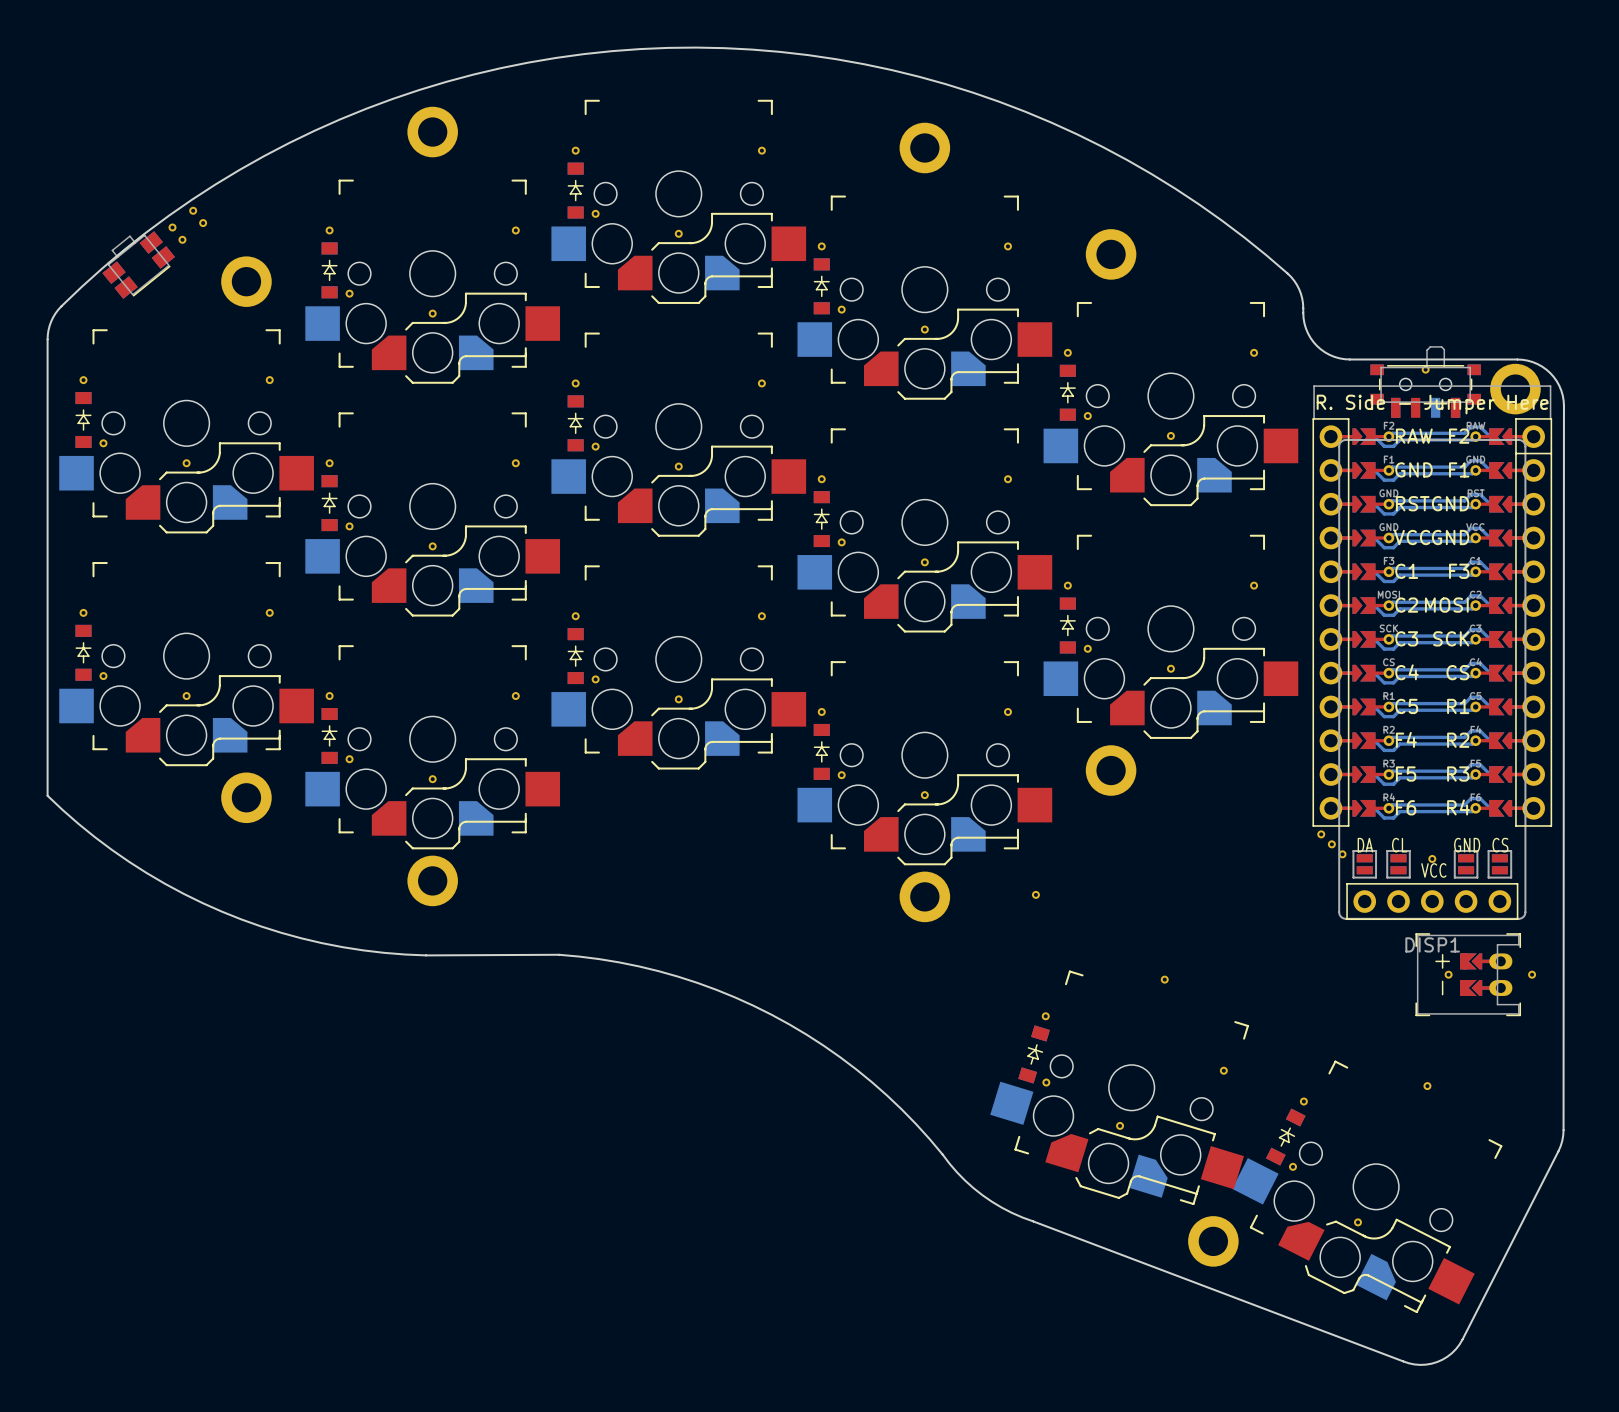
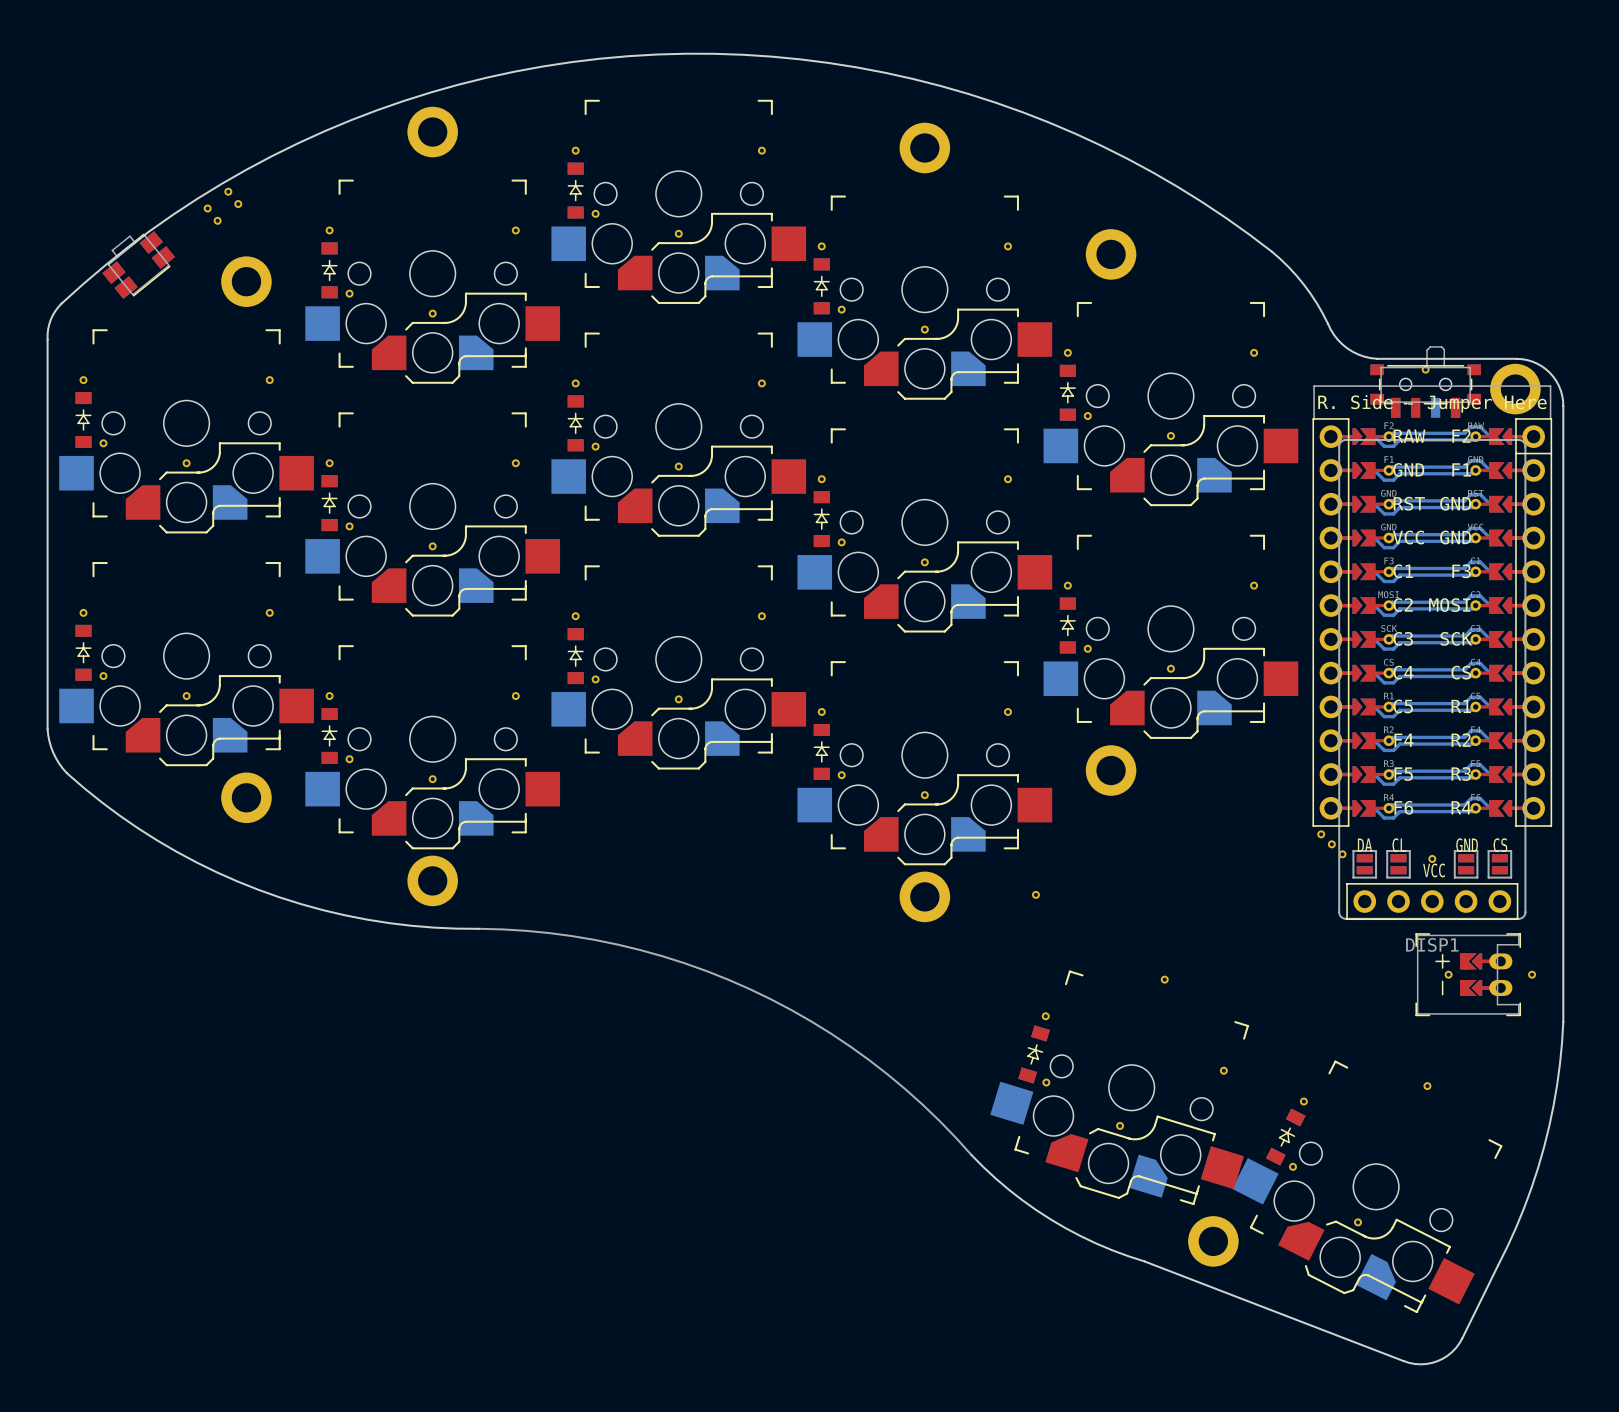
part: none -> (228, 191)
part: none -> (238, 204)
part: none -> (207, 208)
part: (193, 210) -> none
part: none -> (217, 220)
part: (203, 223) -> none
part: (172, 227) -> none
part: (182, 239) -> none
board edge: (47, 339) (51, 321) (61, 306) (102, 268) (146, 232) (215, 184) (264, 156) (314, 130) (392, 98) (446, 81) (500, 68) (556, 57) (611, 51) (696, 47) (752, 49) (808, 55) (891, 69) (972, 92) (1025, 111) (1077, 134) (1127, 160) (1175, 188) (1221, 220) (1287, 273) (1294, 280) (1300, 293) (1304, 323) (1310, 337) (1320, 349) (1334, 356) (1349, 359) (1517, 359) (1537, 364) (1546, 369) (1556, 381) (1561, 390) (1563, 406) (1562, 1140) (1459, 1344) (1452, 1353) (1437, 1362) (1426, 1364) (1408, 1363) (1022, 1217) (1001, 1207) (965, 1180) (901, 1109) (856, 1069) (823, 1045) (789, 1024) (753, 1005) (716, 989) (678, 976) (639, 966) (579, 956) (559, 954) (426, 955) (384, 952) (342, 947) (301, 938) (260, 926) (202, 903) (165, 883) (111, 849) (78, 824) (47, 795) (47, 729) -> (479, 928) (411, 925) (344, 915) (279, 897) (216, 872) (176, 851) (138, 828) (83, 787) (59, 763) (51, 747) (47, 729)
board edge: none -> (47, 339) (49, 324) (58, 307) (127, 248) (173, 214) (221, 183) (272, 156) (323, 131) (404, 100) (459, 84) (515, 71) (571, 62) (628, 56) (714, 53) (771, 56) (857, 67) (941, 86) (1022, 112) (1075, 133) (1127, 158) (1201, 201) (1249, 234) (1272, 251) (1296, 275) (1316, 303) (1333, 334) (1352, 351) (1377, 358) (1522, 359) (1537, 363) (1545, 369) (1558, 385) (1563, 406) (1562, 1043) (1557, 1085) (1549, 1126) (1531, 1187) (1507, 1246) (1459, 1343) (1447, 1355) (1437, 1361) (1426, 1364) (1409, 1362) (1111, 1250) (1080, 1236) (1036, 1210) (1009, 1189) (971, 1154)
line: none -> (479, 928) (548, 933) (617, 944) (684, 963) (749, 989) (811, 1021) (869, 1060) (922, 1104) (971, 1154)

